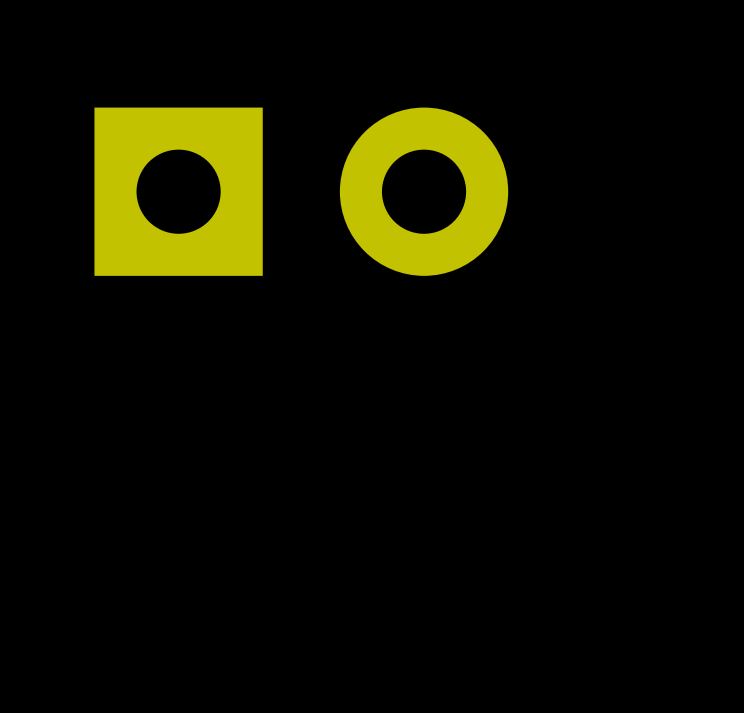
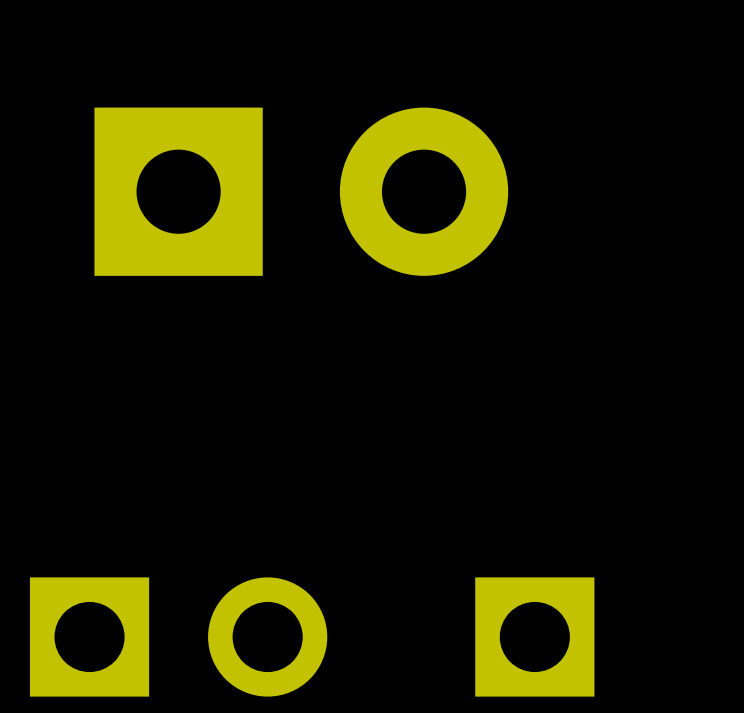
part: none -> (178, 636)
part: none -> (534, 636)

